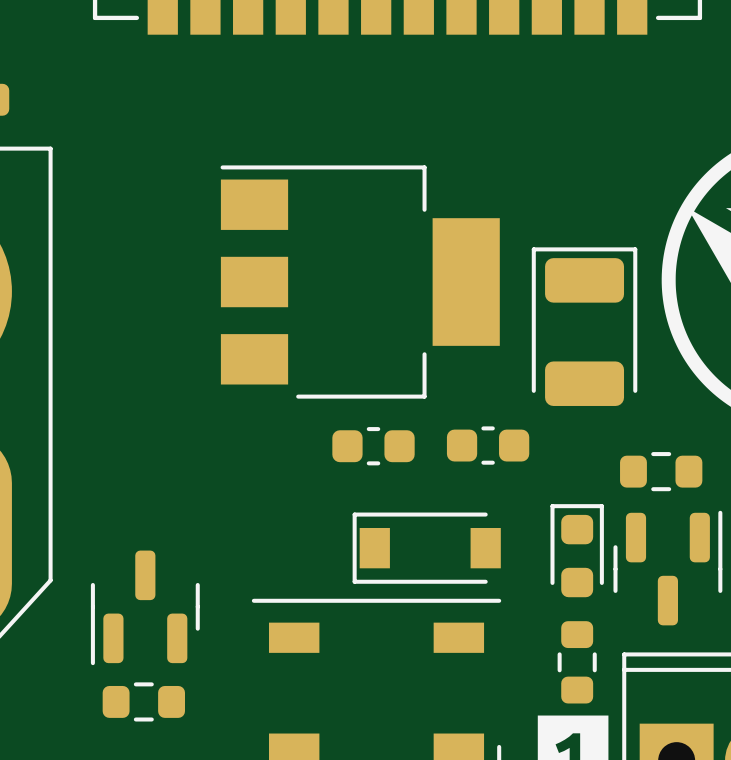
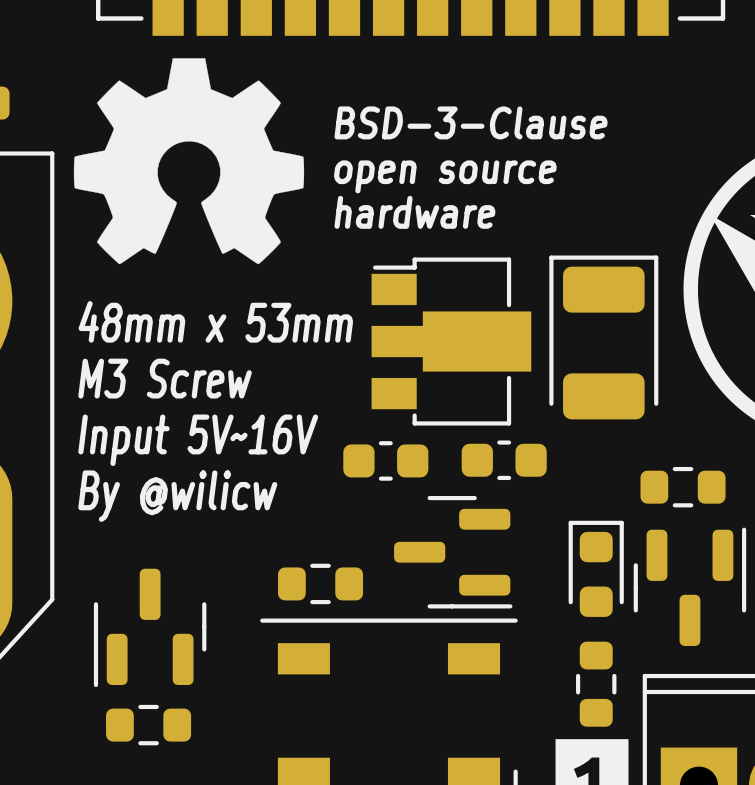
drawing: none -> [73, 58, 305, 265]
text: none -> BSD-3-Clause (471, 122)
text: none -> open source (445, 176)
text: none -> hardware (414, 212)
part: (360, 282) -> none
text: none -> 48mm x 53mm (215, 321)
part: none -> (451, 341)
text: none -> M3 Screw (165, 378)
text: none -> Input 5V~16V (198, 440)
text: none -> By @wilicw (177, 496)
part footprint: [352, 512, 501, 584] -> [394, 496, 513, 609]
part: none -> (320, 583)

